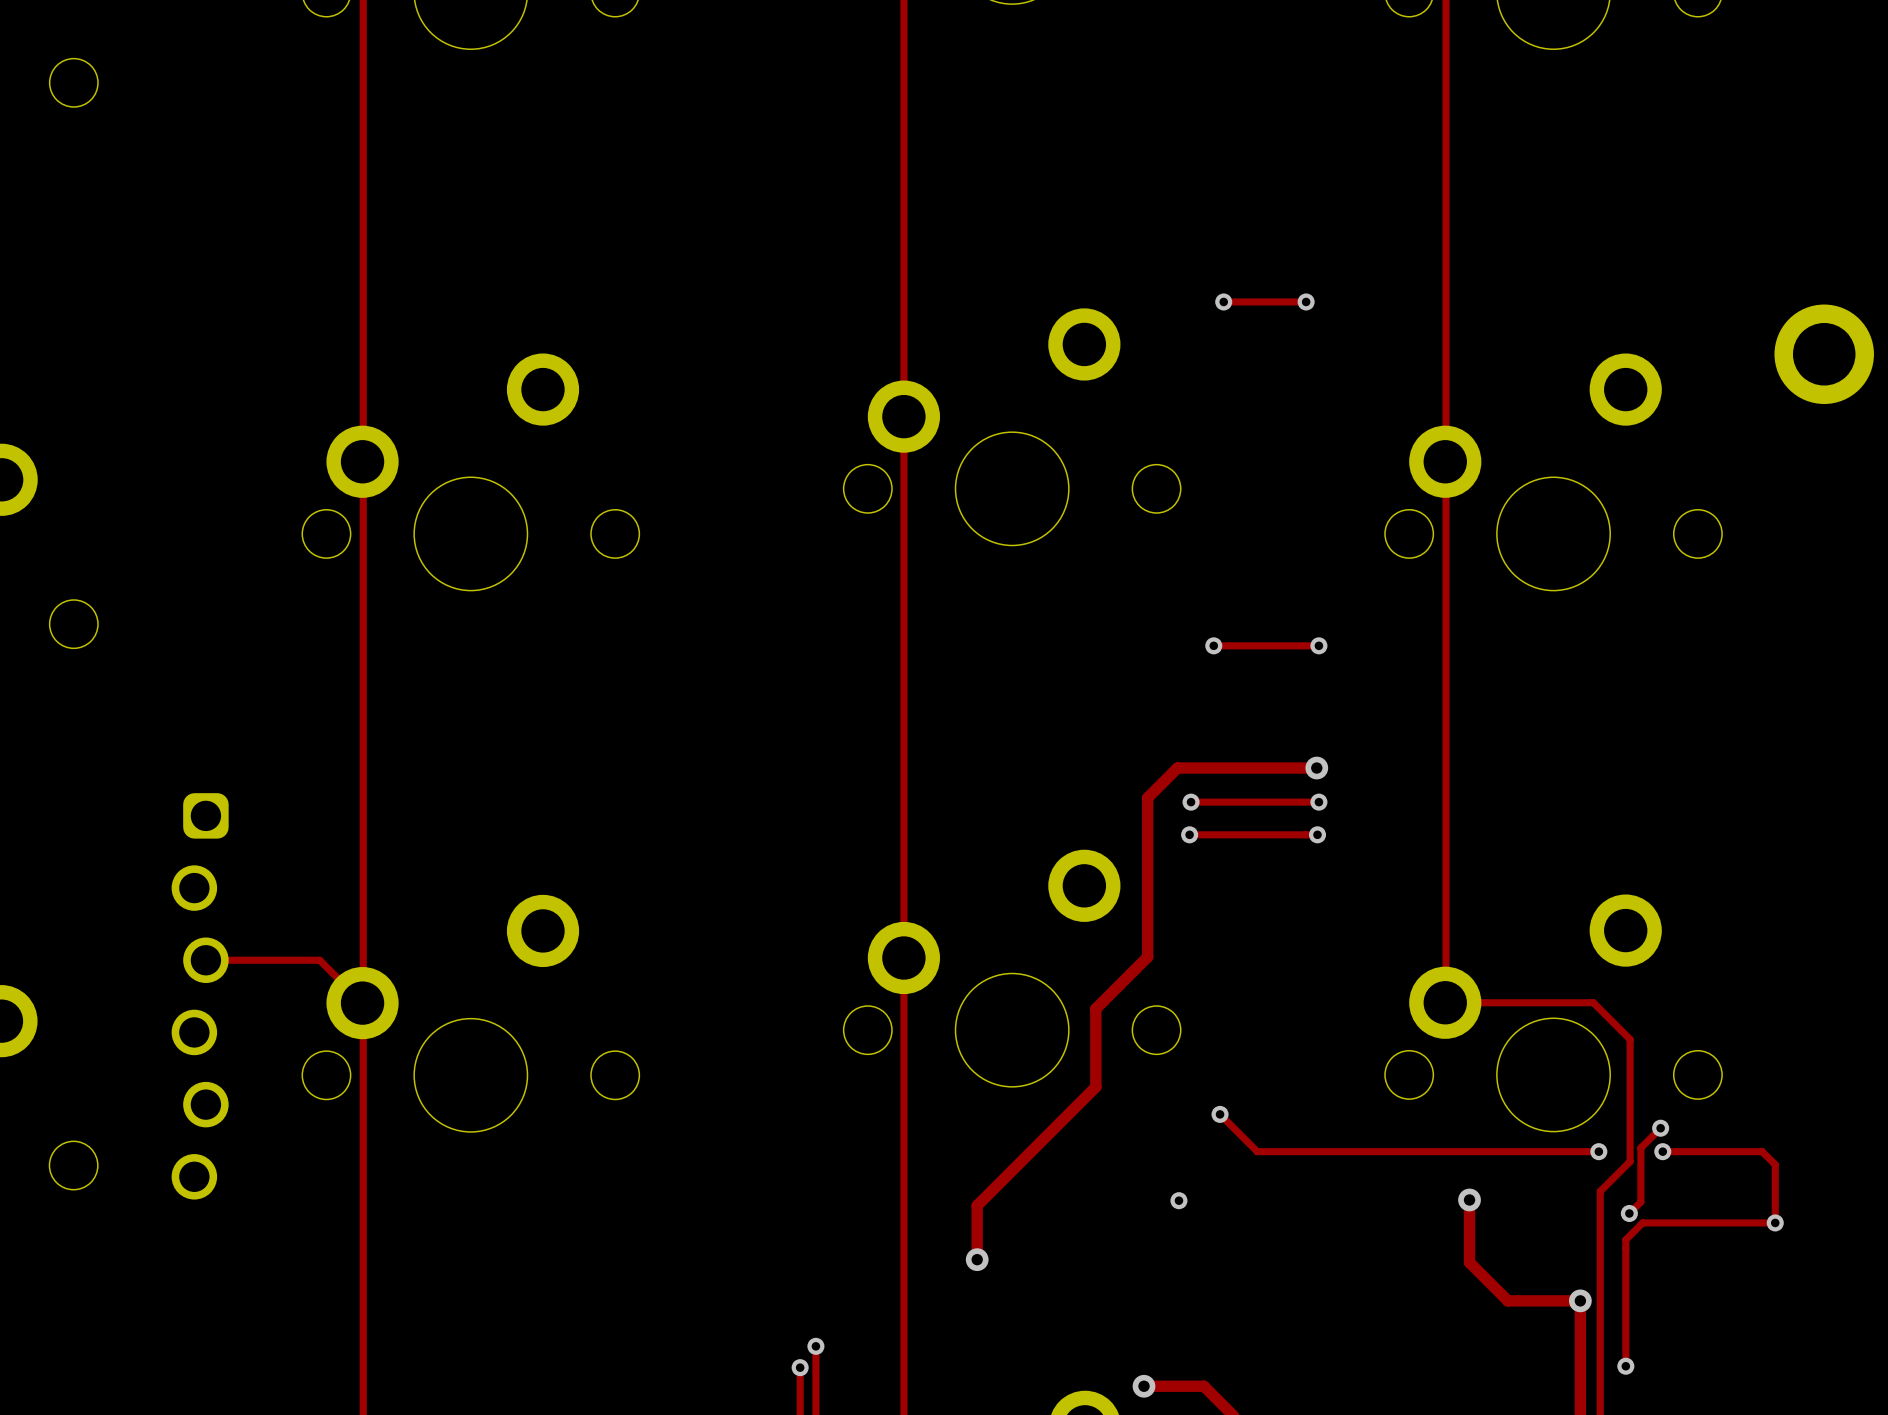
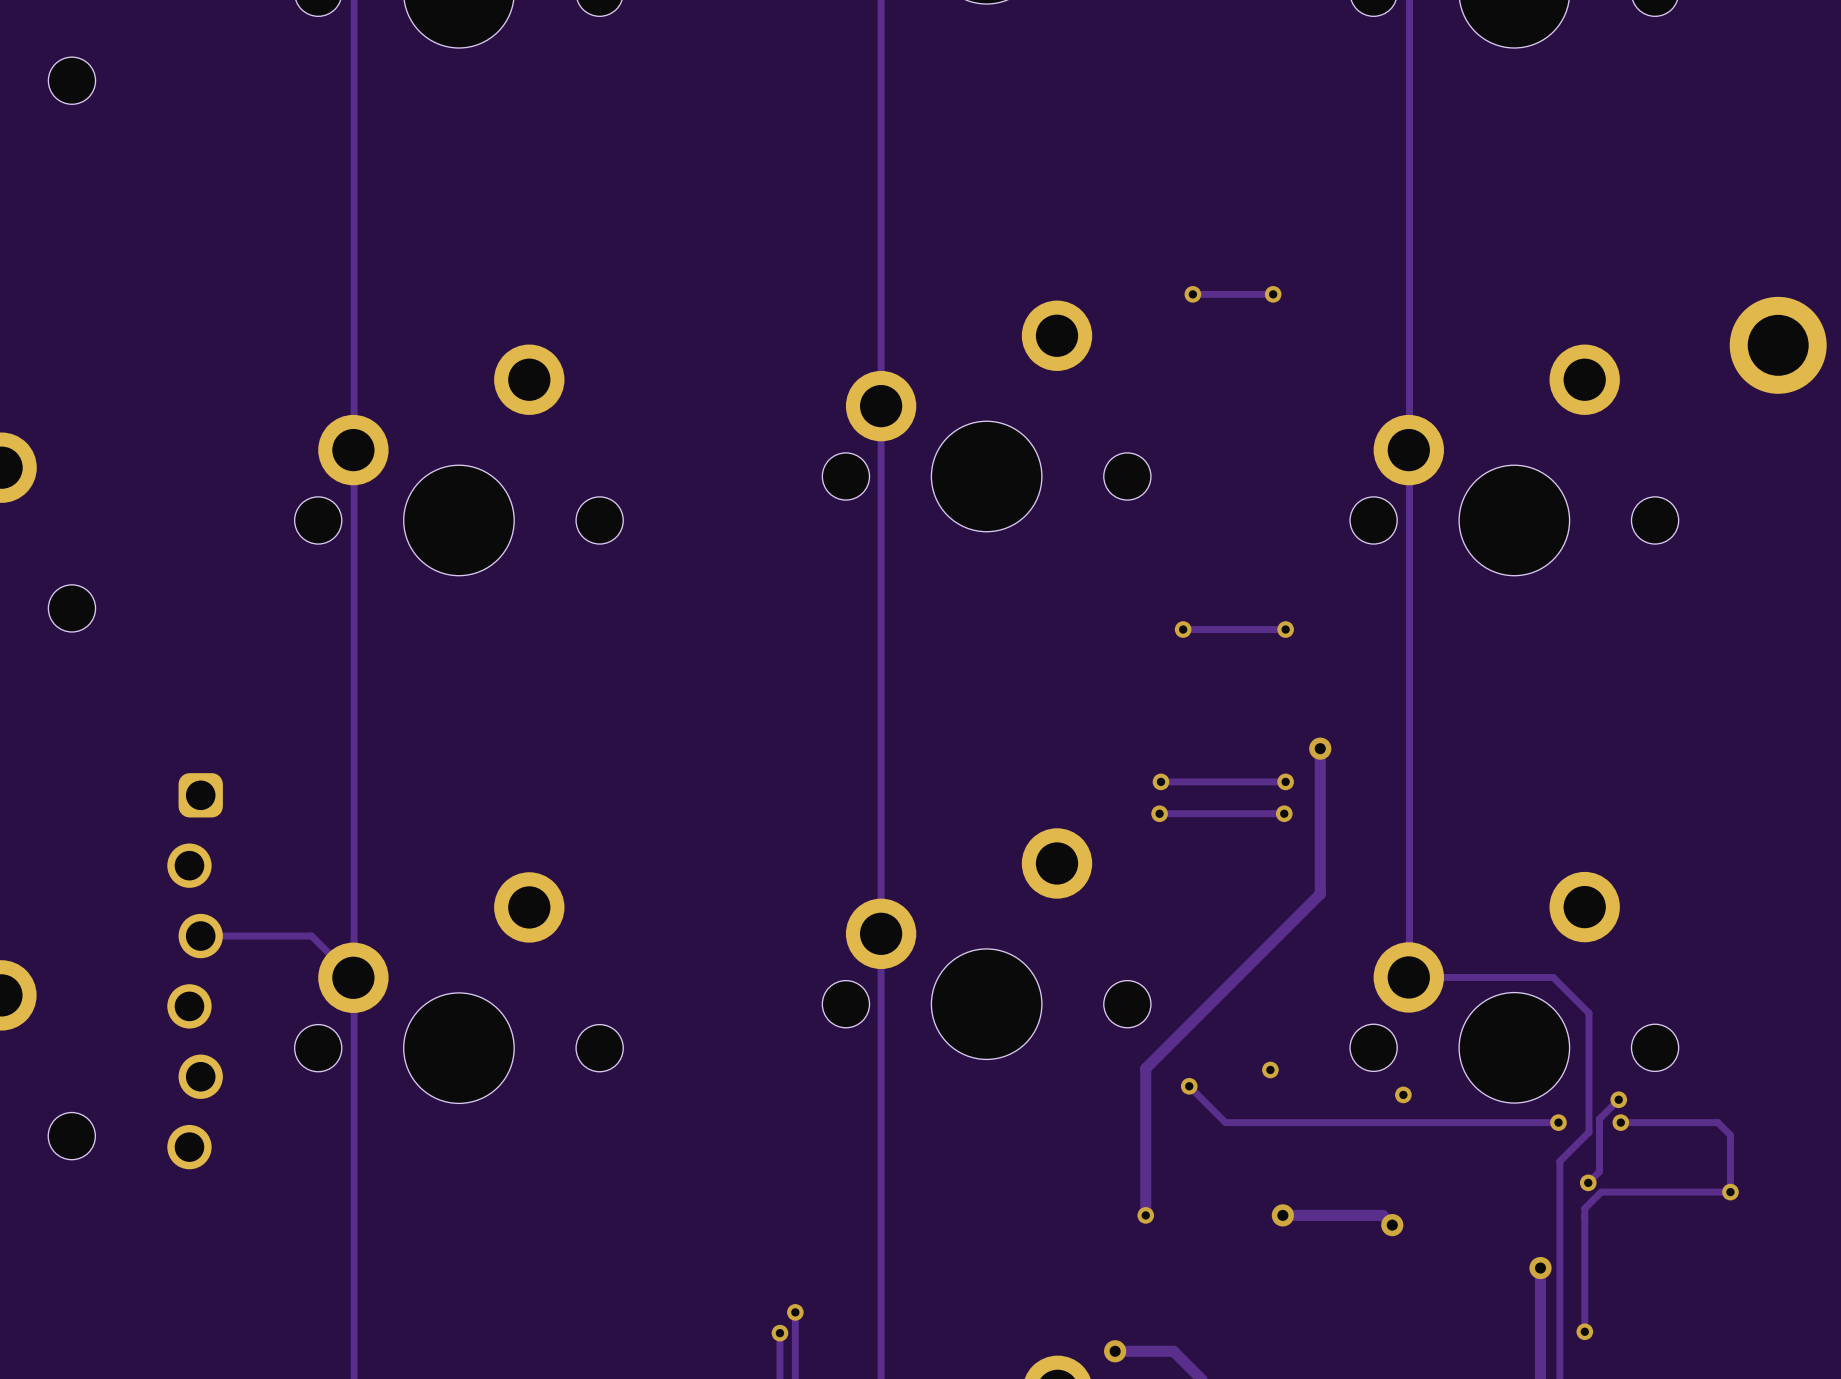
track: (1316, 768) (1177, 768) (1147, 797) (1147, 957) (1095, 1008) (1095, 1087) (977, 1205) (977, 1259) -> none
via position: (1316, 768) -> (1320, 748)
track: none -> (1320, 748) (1320, 894) (1145, 1068) (1145, 1215)
via: none -> (1270, 1069)
via: none -> (1403, 1094)
track: (1469, 1199) (1469, 1262) (1507, 1300) (1580, 1300) -> none
via position: (1469, 1199) -> (1392, 1225)
via position: (1178, 1200) -> (1145, 1215)
track: none -> (1282, 1215) (1382, 1215) (1392, 1225)
via: none -> (1282, 1215)
via: (977, 1259) -> none

